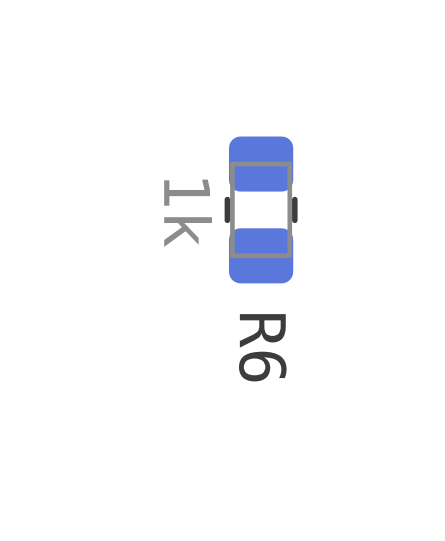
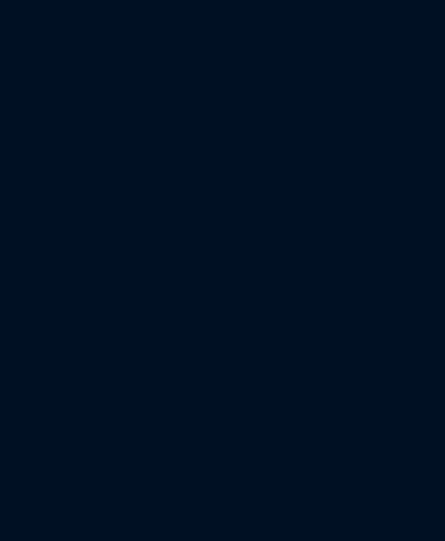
R6: 1k (261, 209) -> none

